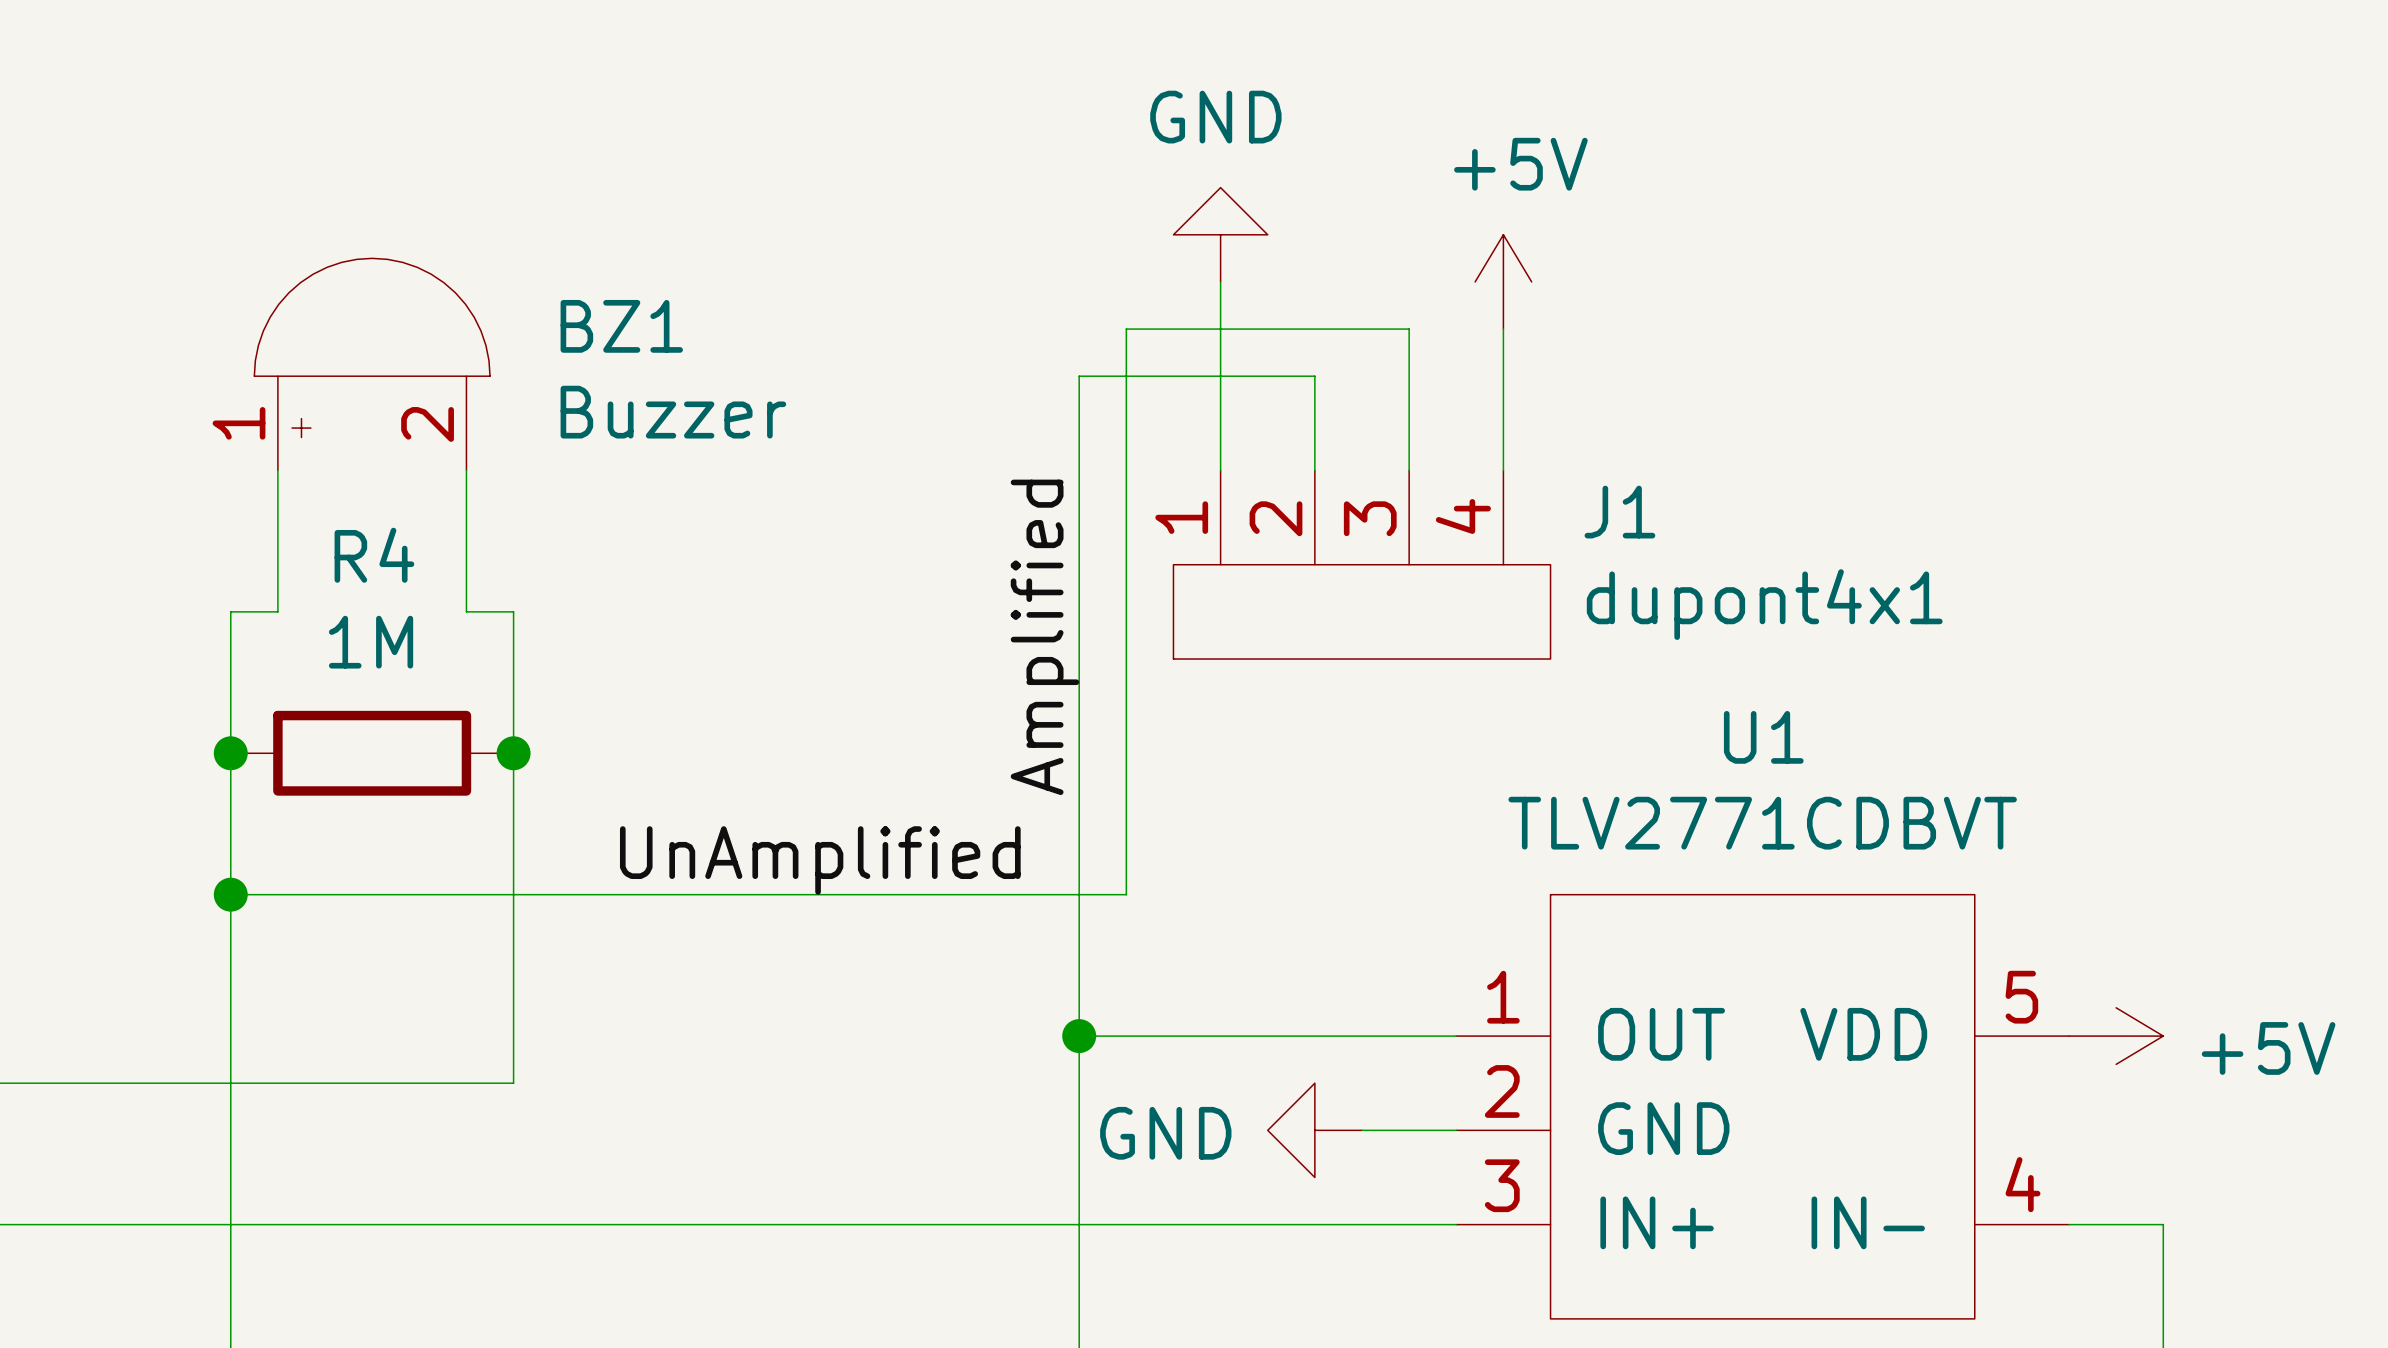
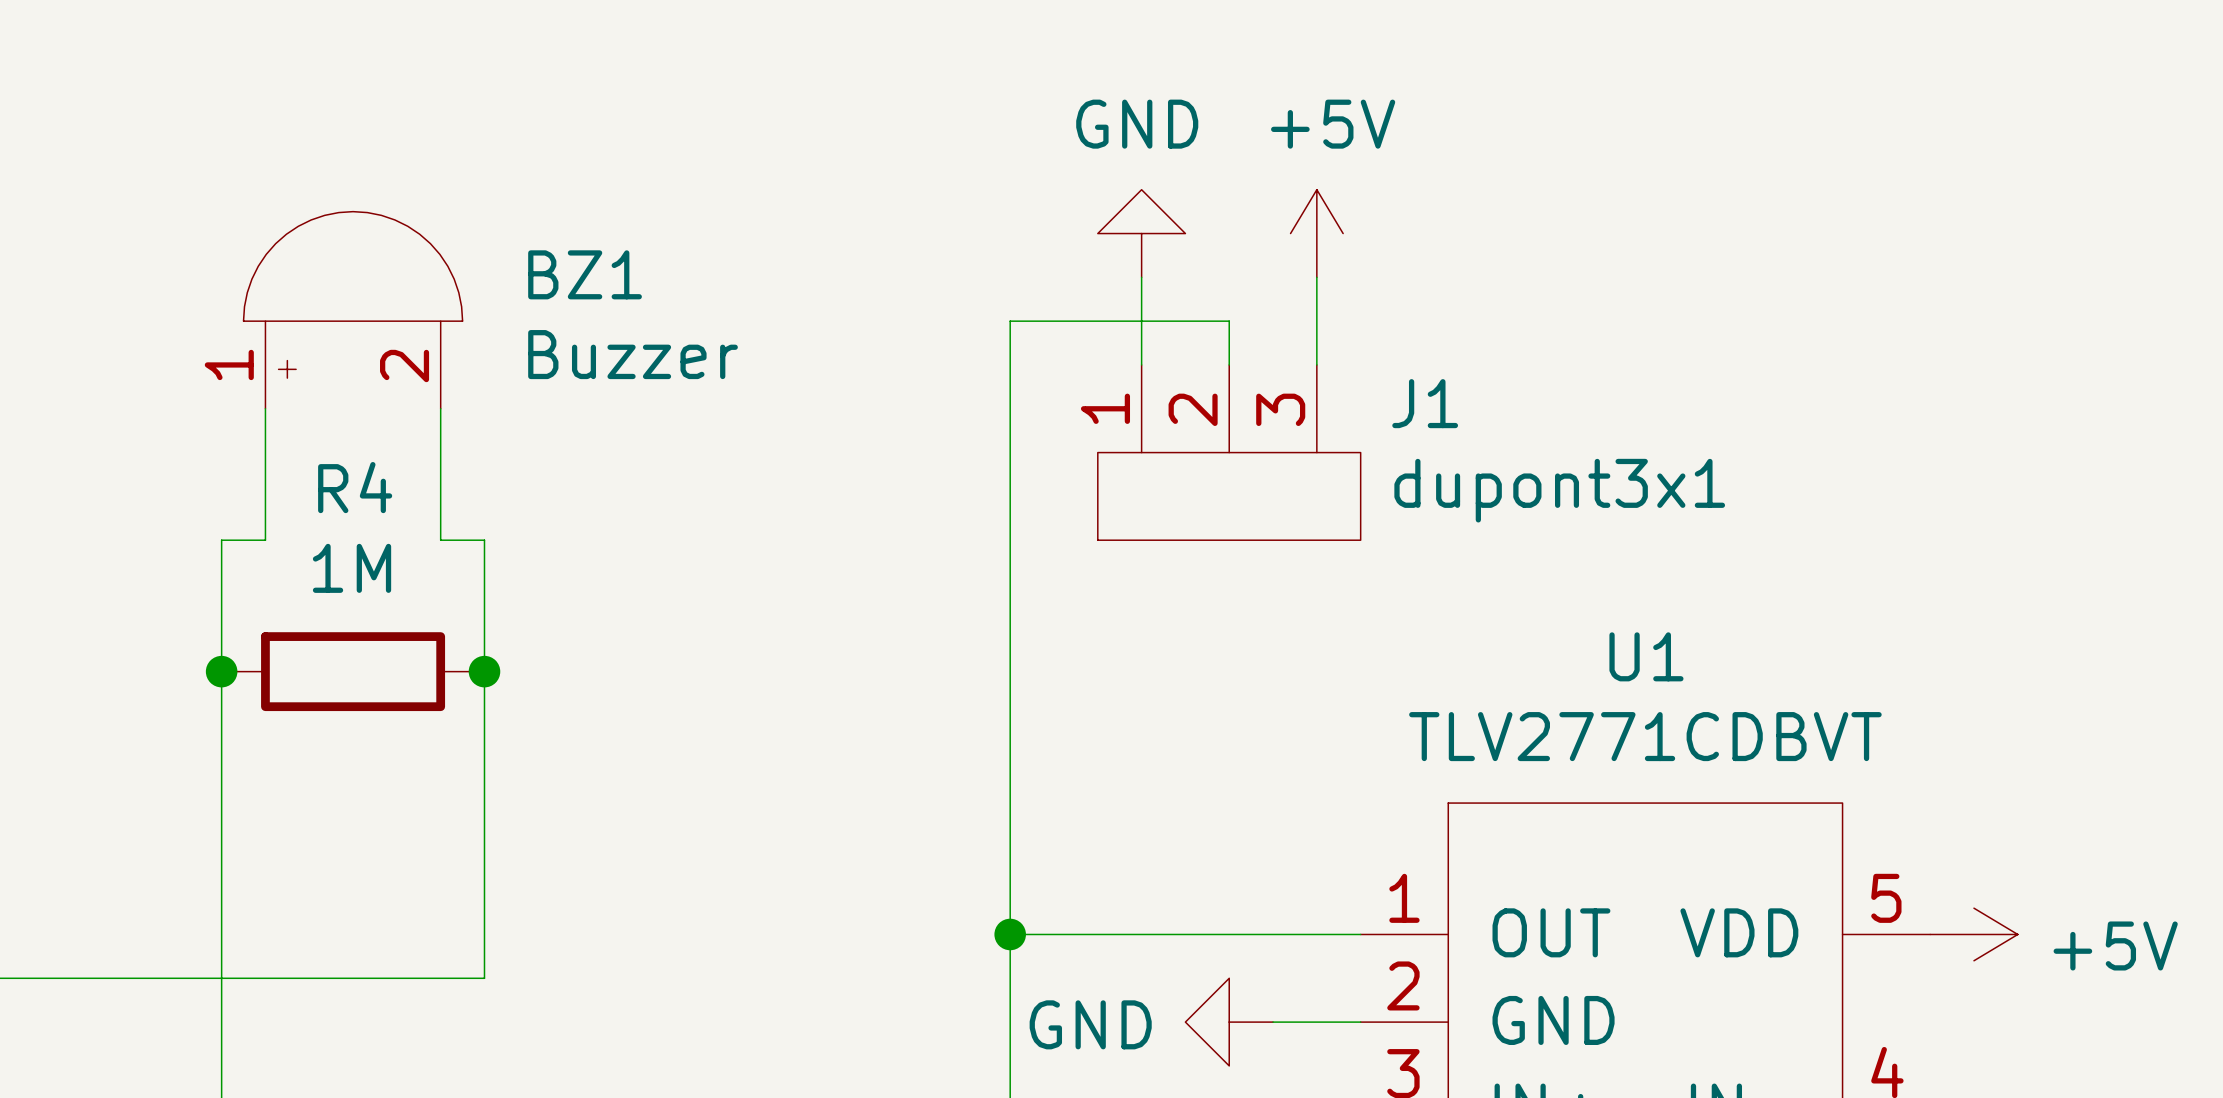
power symbol position: GND (1220, 234) -> GND (1141, 233)
power symbol position: +5V (1503, 281) -> +5V (1316, 233)
wire: (1409, 329) (1126, 329) (1126, 894) (230, 894) -> none
wire: (1503, 329) (1503, 470) -> none
J1 symbol: [1173, 470, 1551, 660] -> [1097, 364, 1361, 541]
J1 value: dupont4x1 (1764, 604) -> dupont3x1 (1559, 490)
label: Amplified (1044, 637) -> none
label: UnAmplified (820, 860) -> none
junction: (230, 894) -> none

